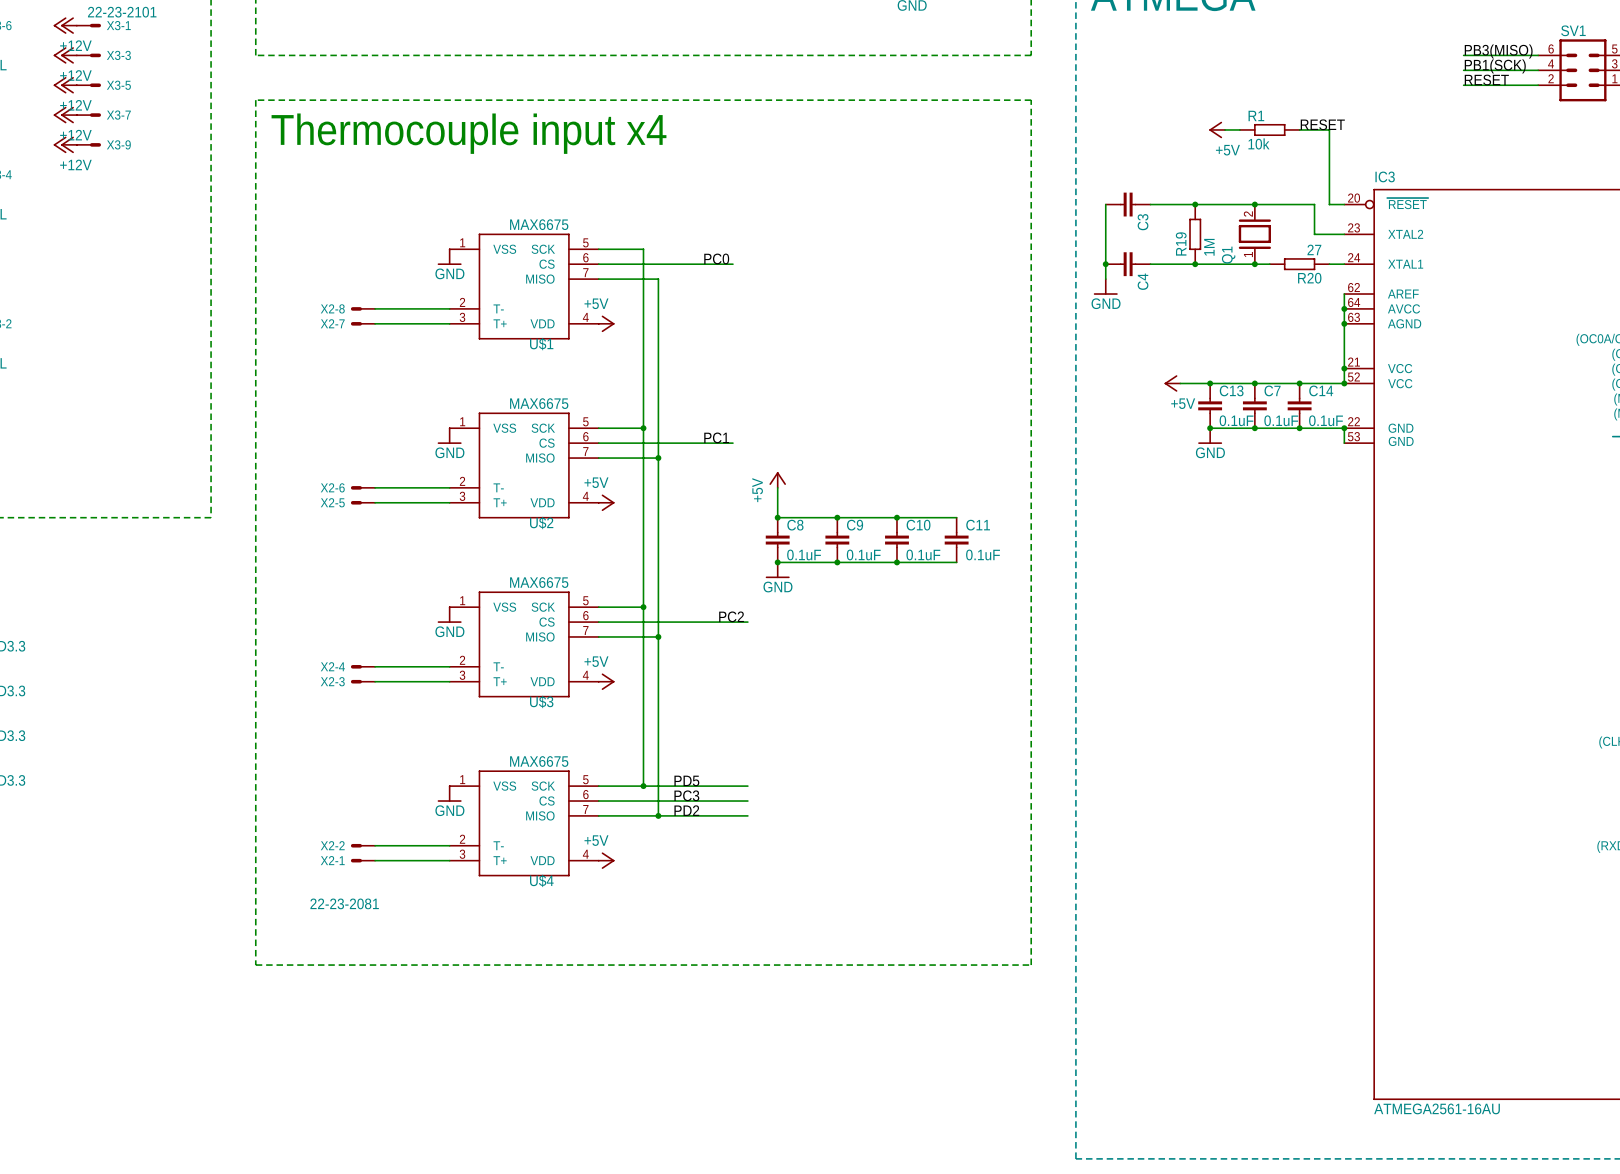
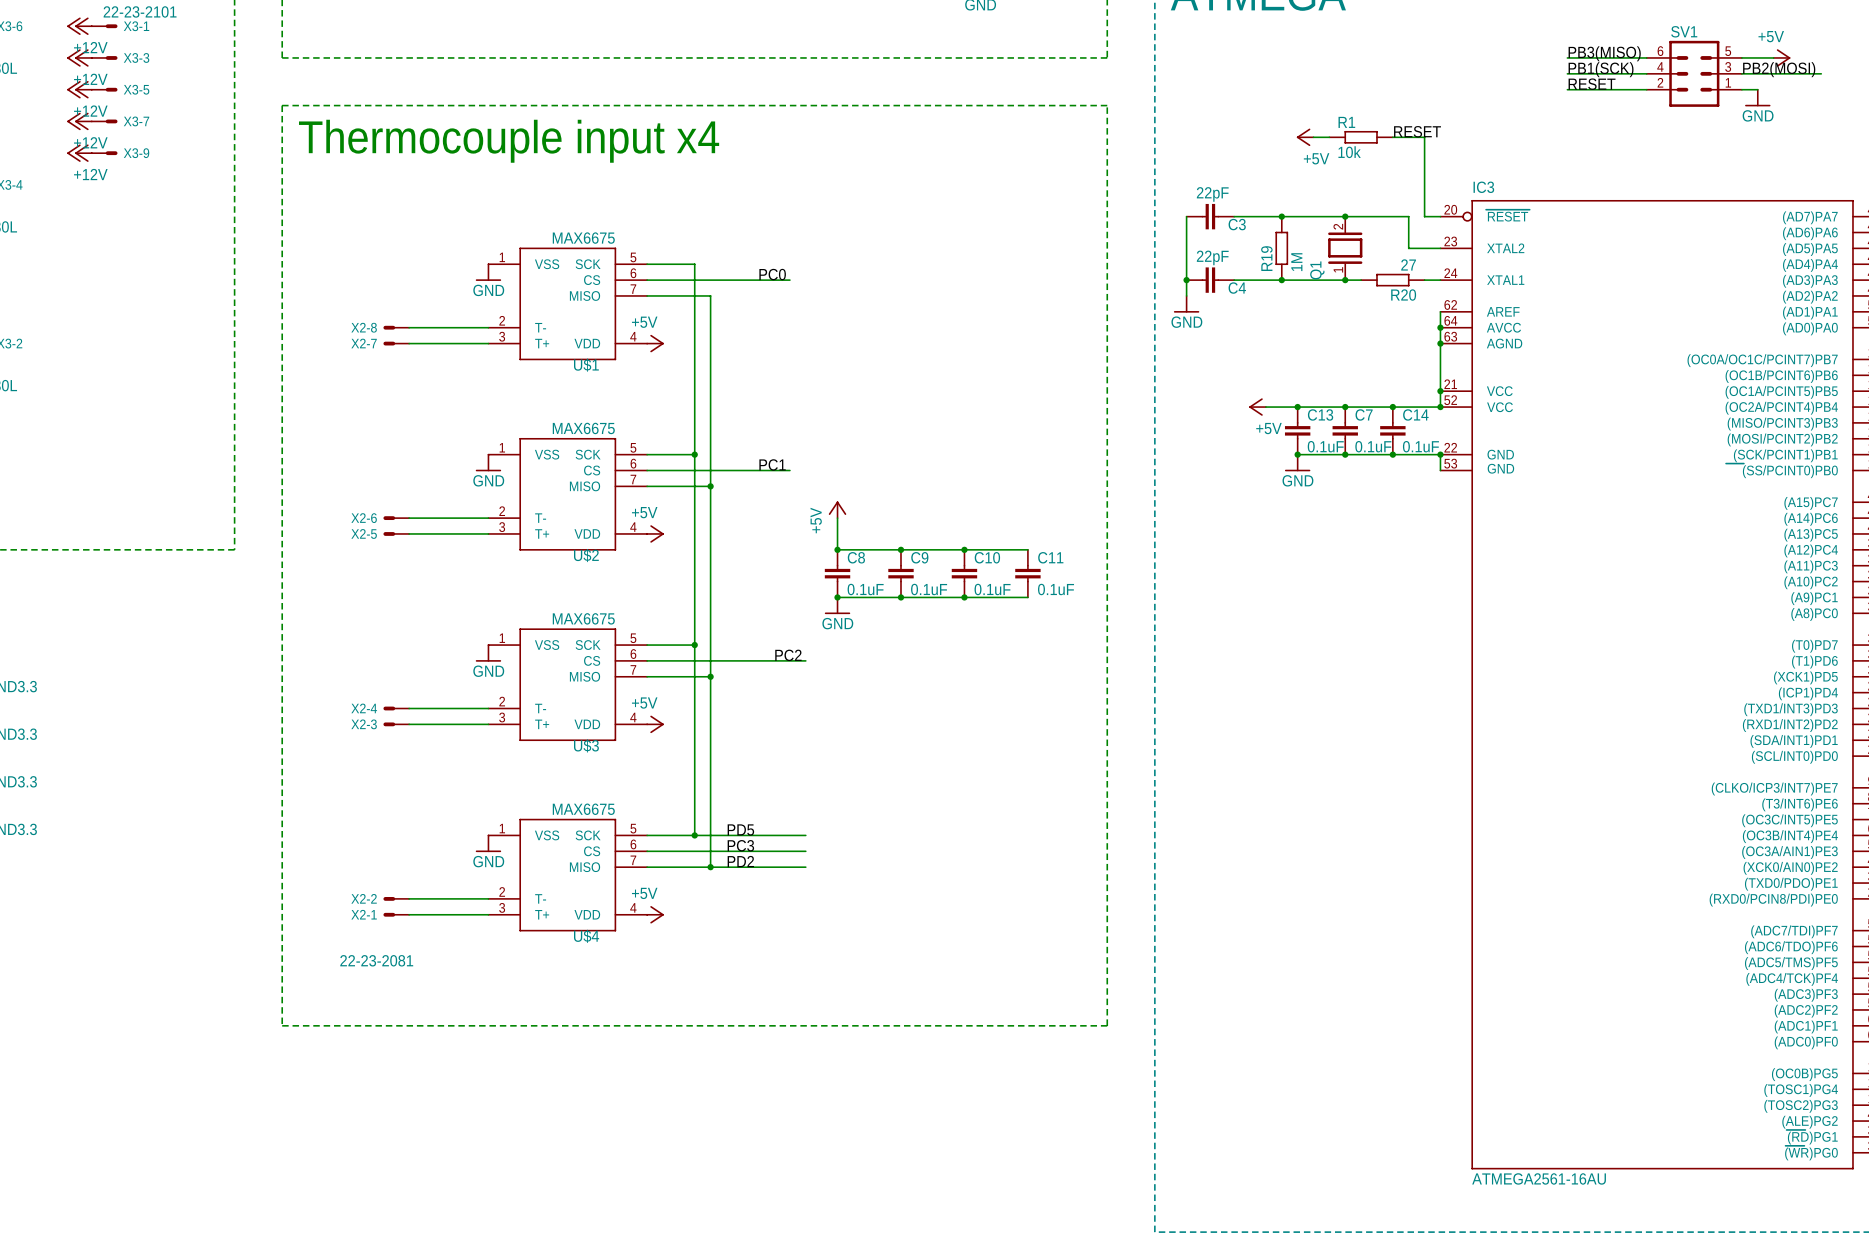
C3 value: none -> 22pF (1212, 194)
C3 name rotation: 0° (1143, 222) -> 90° clockwise (1237, 224)
C4 value: none -> 22pF (1212, 257)
C4 name rotation: 0° (1143, 281) -> 90° clockwise (1237, 288)

